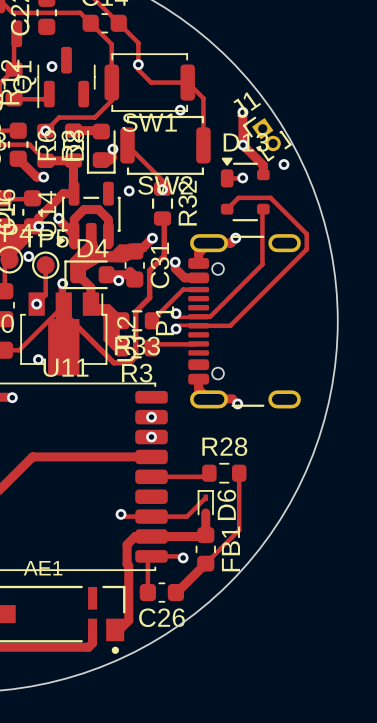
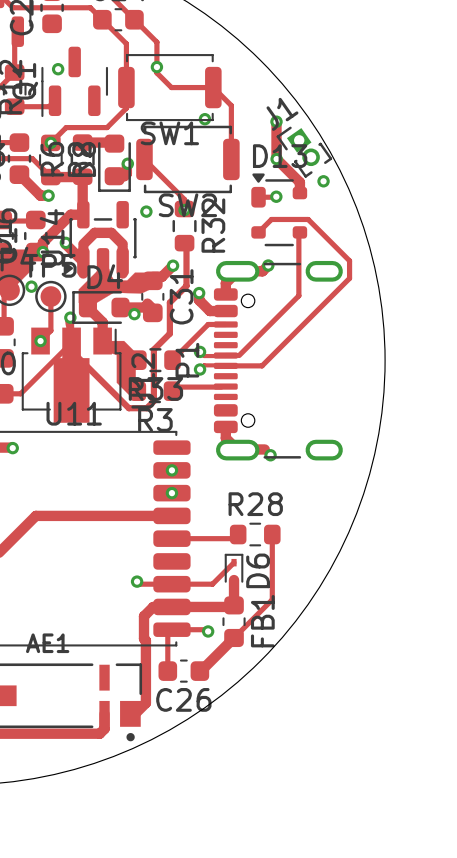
via: (38, 359) -> none

